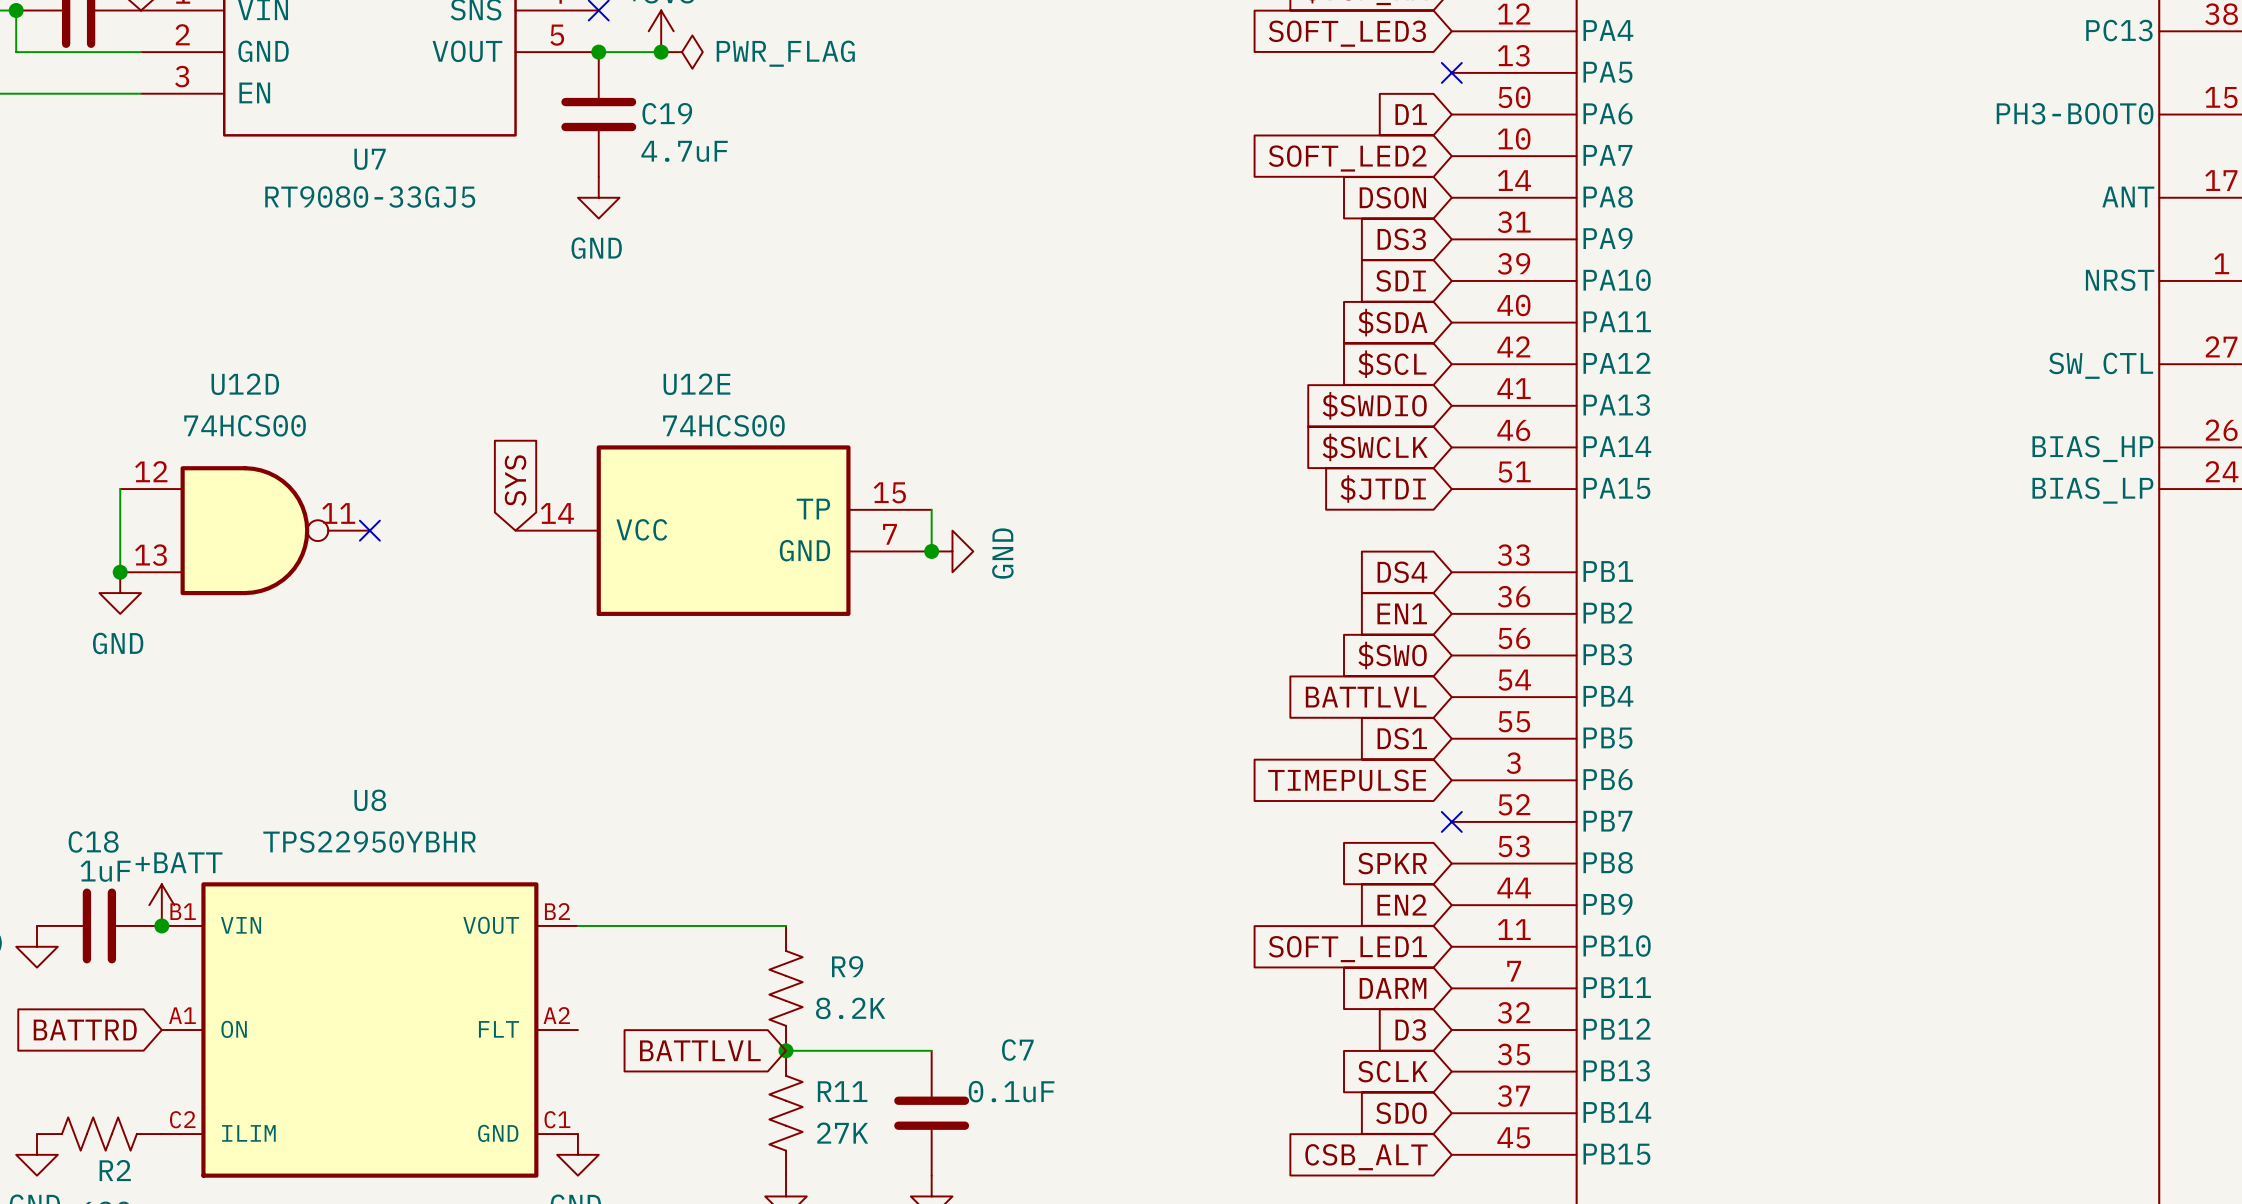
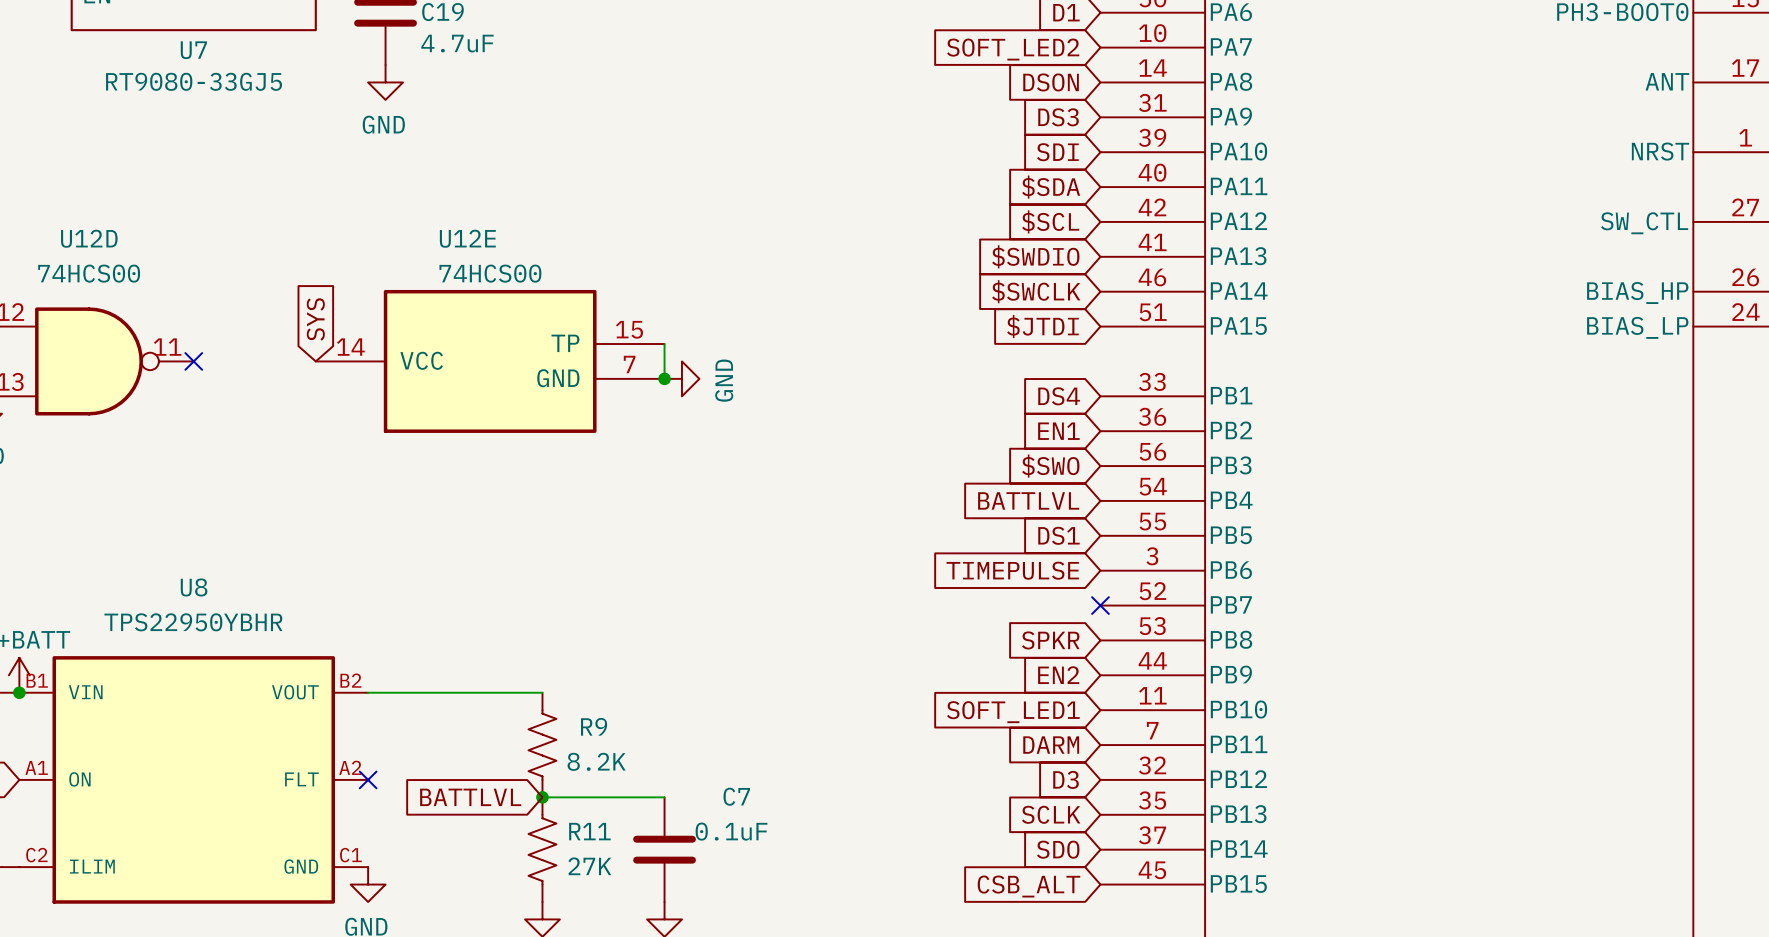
no-connect mark: none -> (368, 779)

